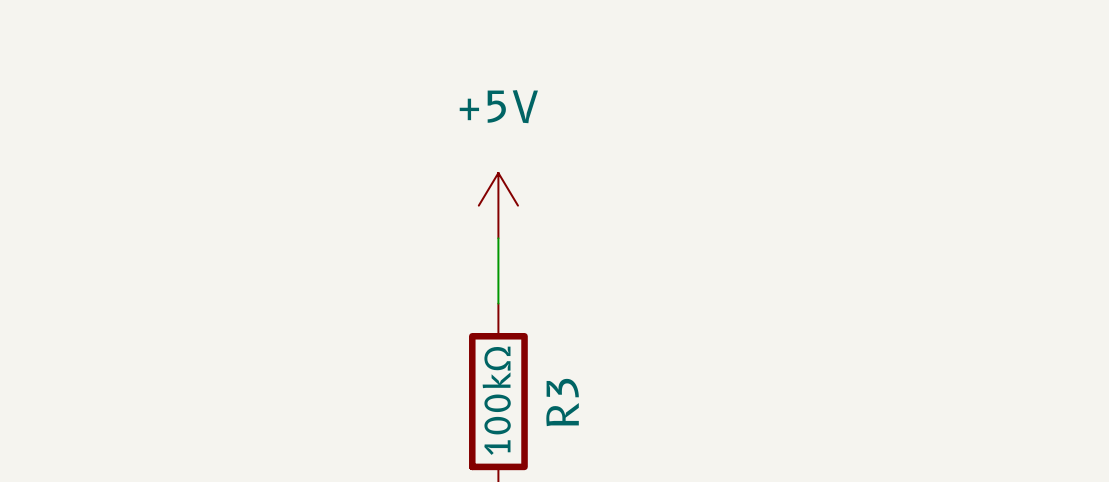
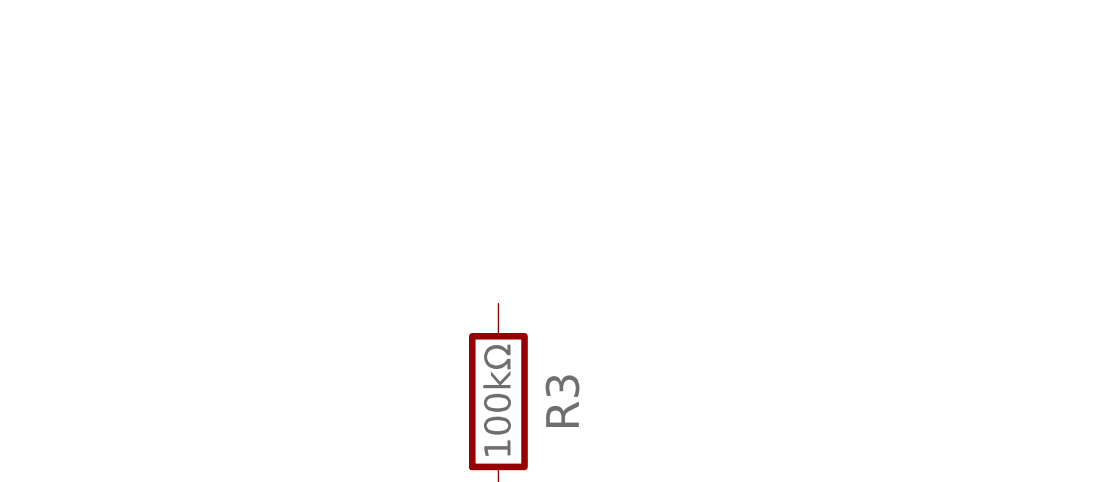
power symbol: +5V (498, 205) -> none
wire: (498, 238) (498, 303) -> none

